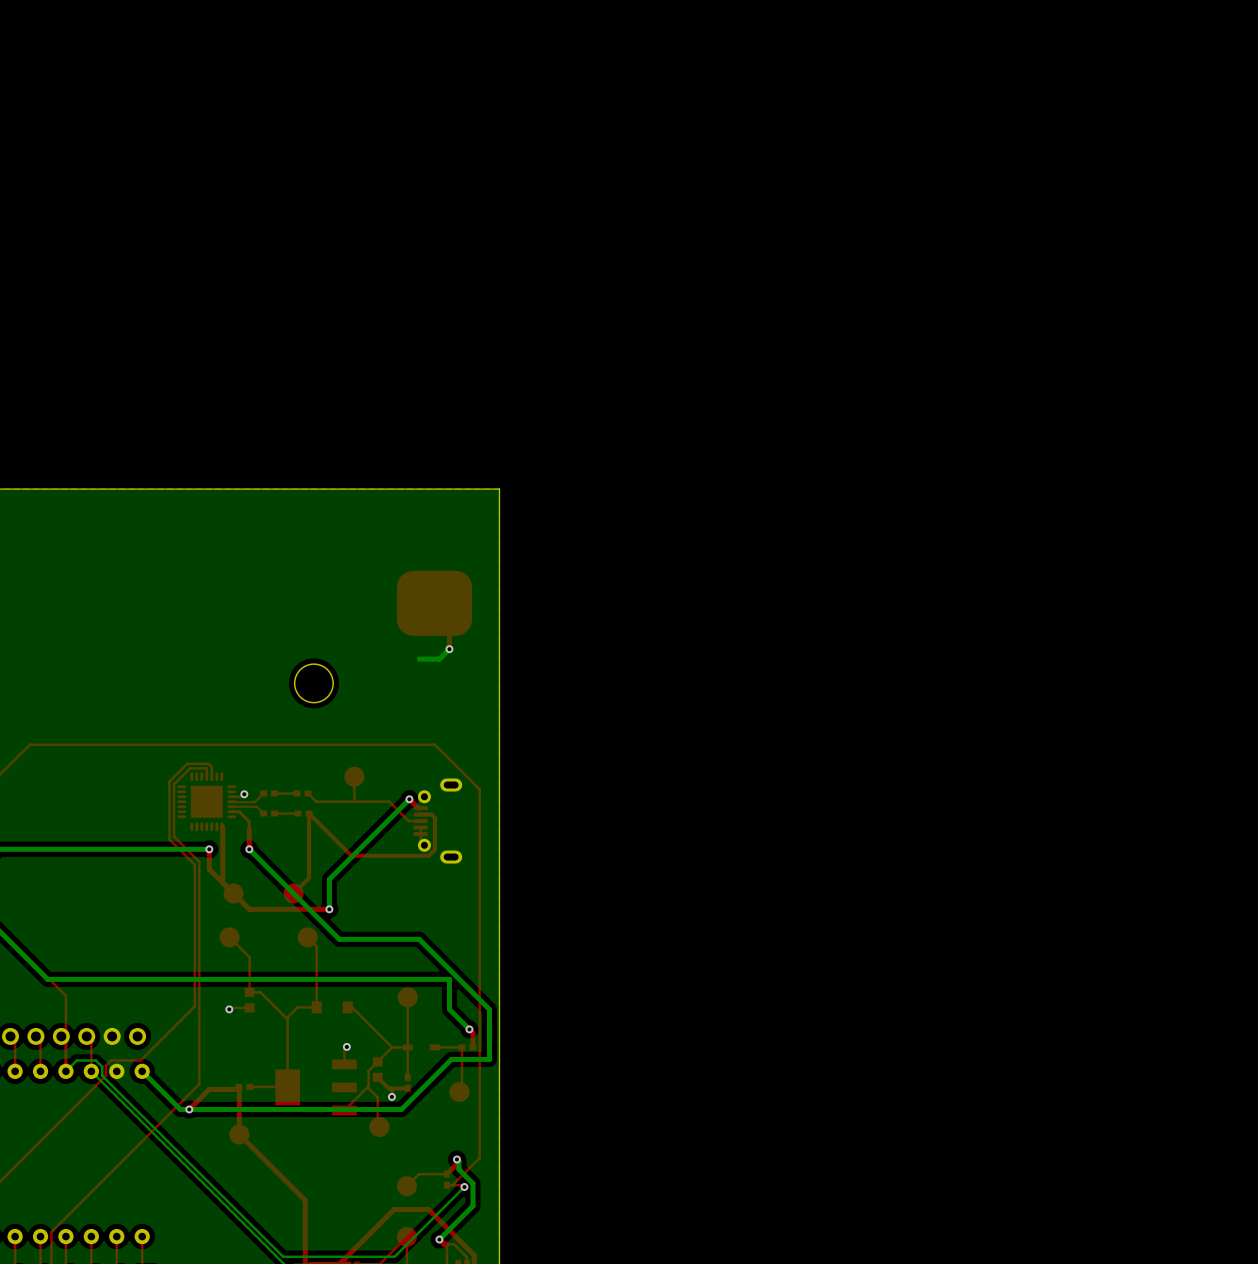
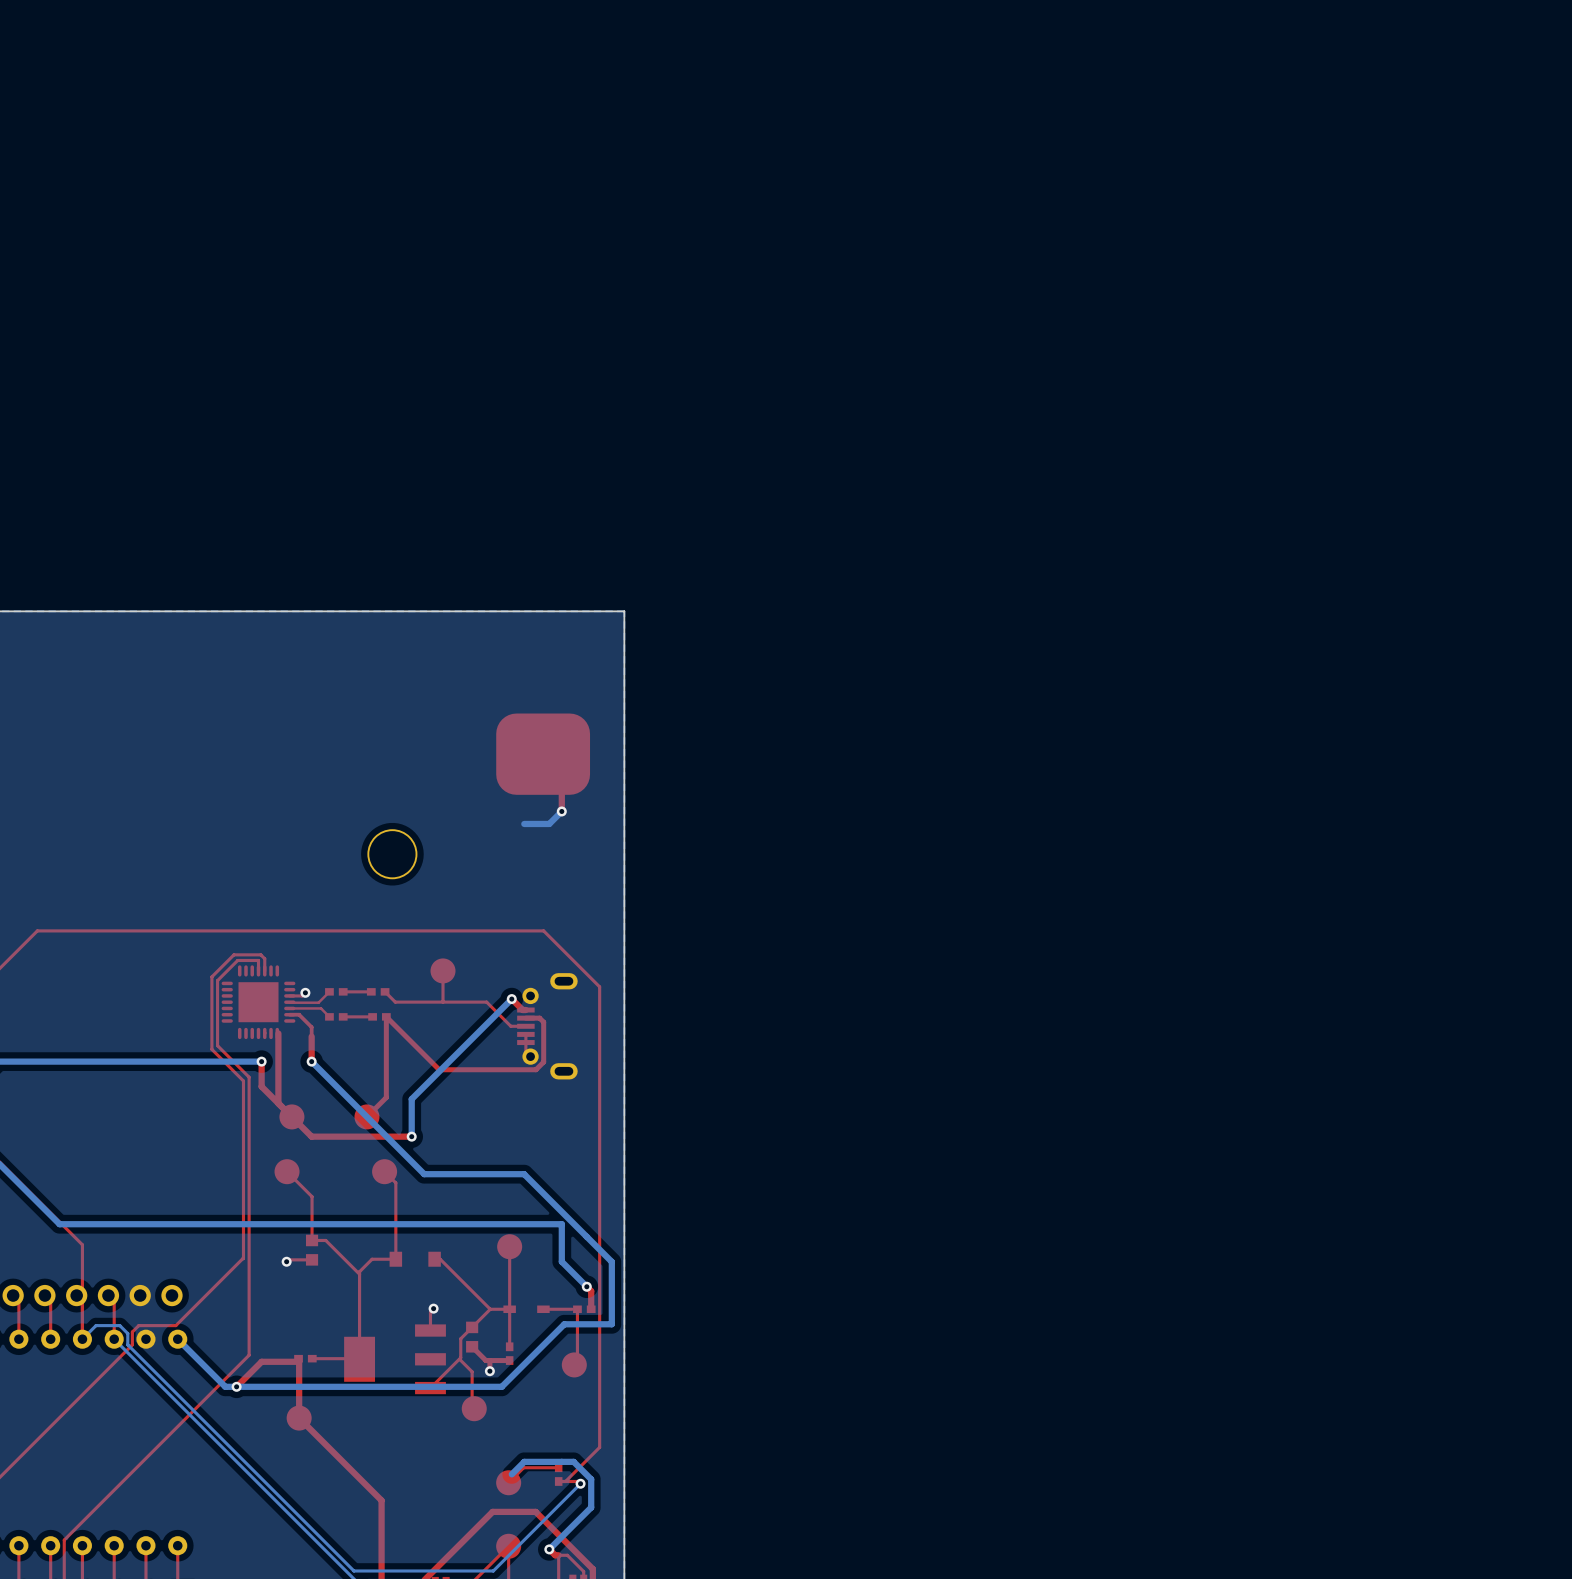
top track: (456, 1159) (456, 1164) (446, 1174) -> none
bottom track: (456, 1159) (458, 1161) (458, 1169) -> (511, 1474) (524, 1461) (573, 1461)
via: (456, 1159) -> none

